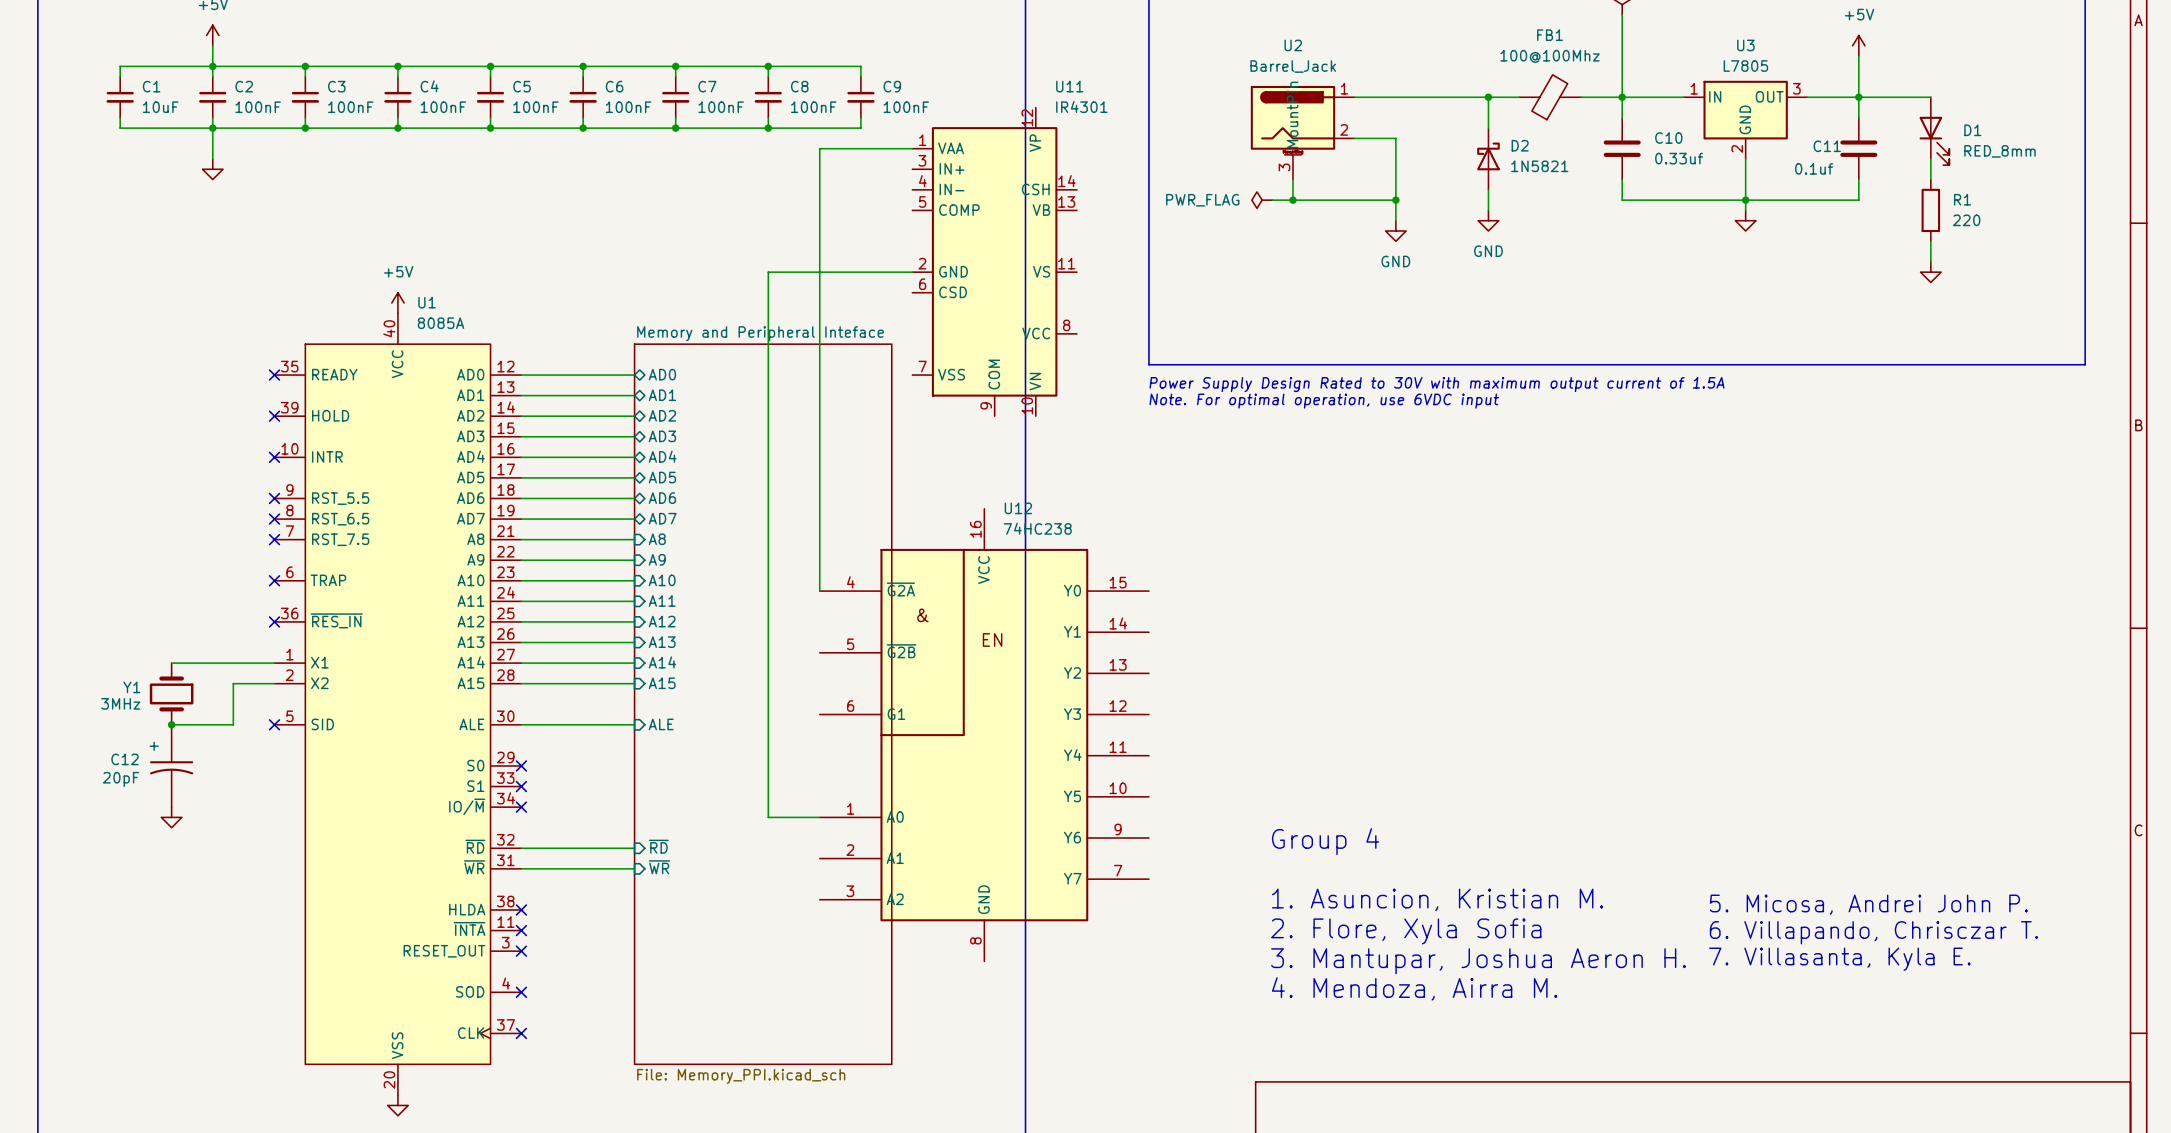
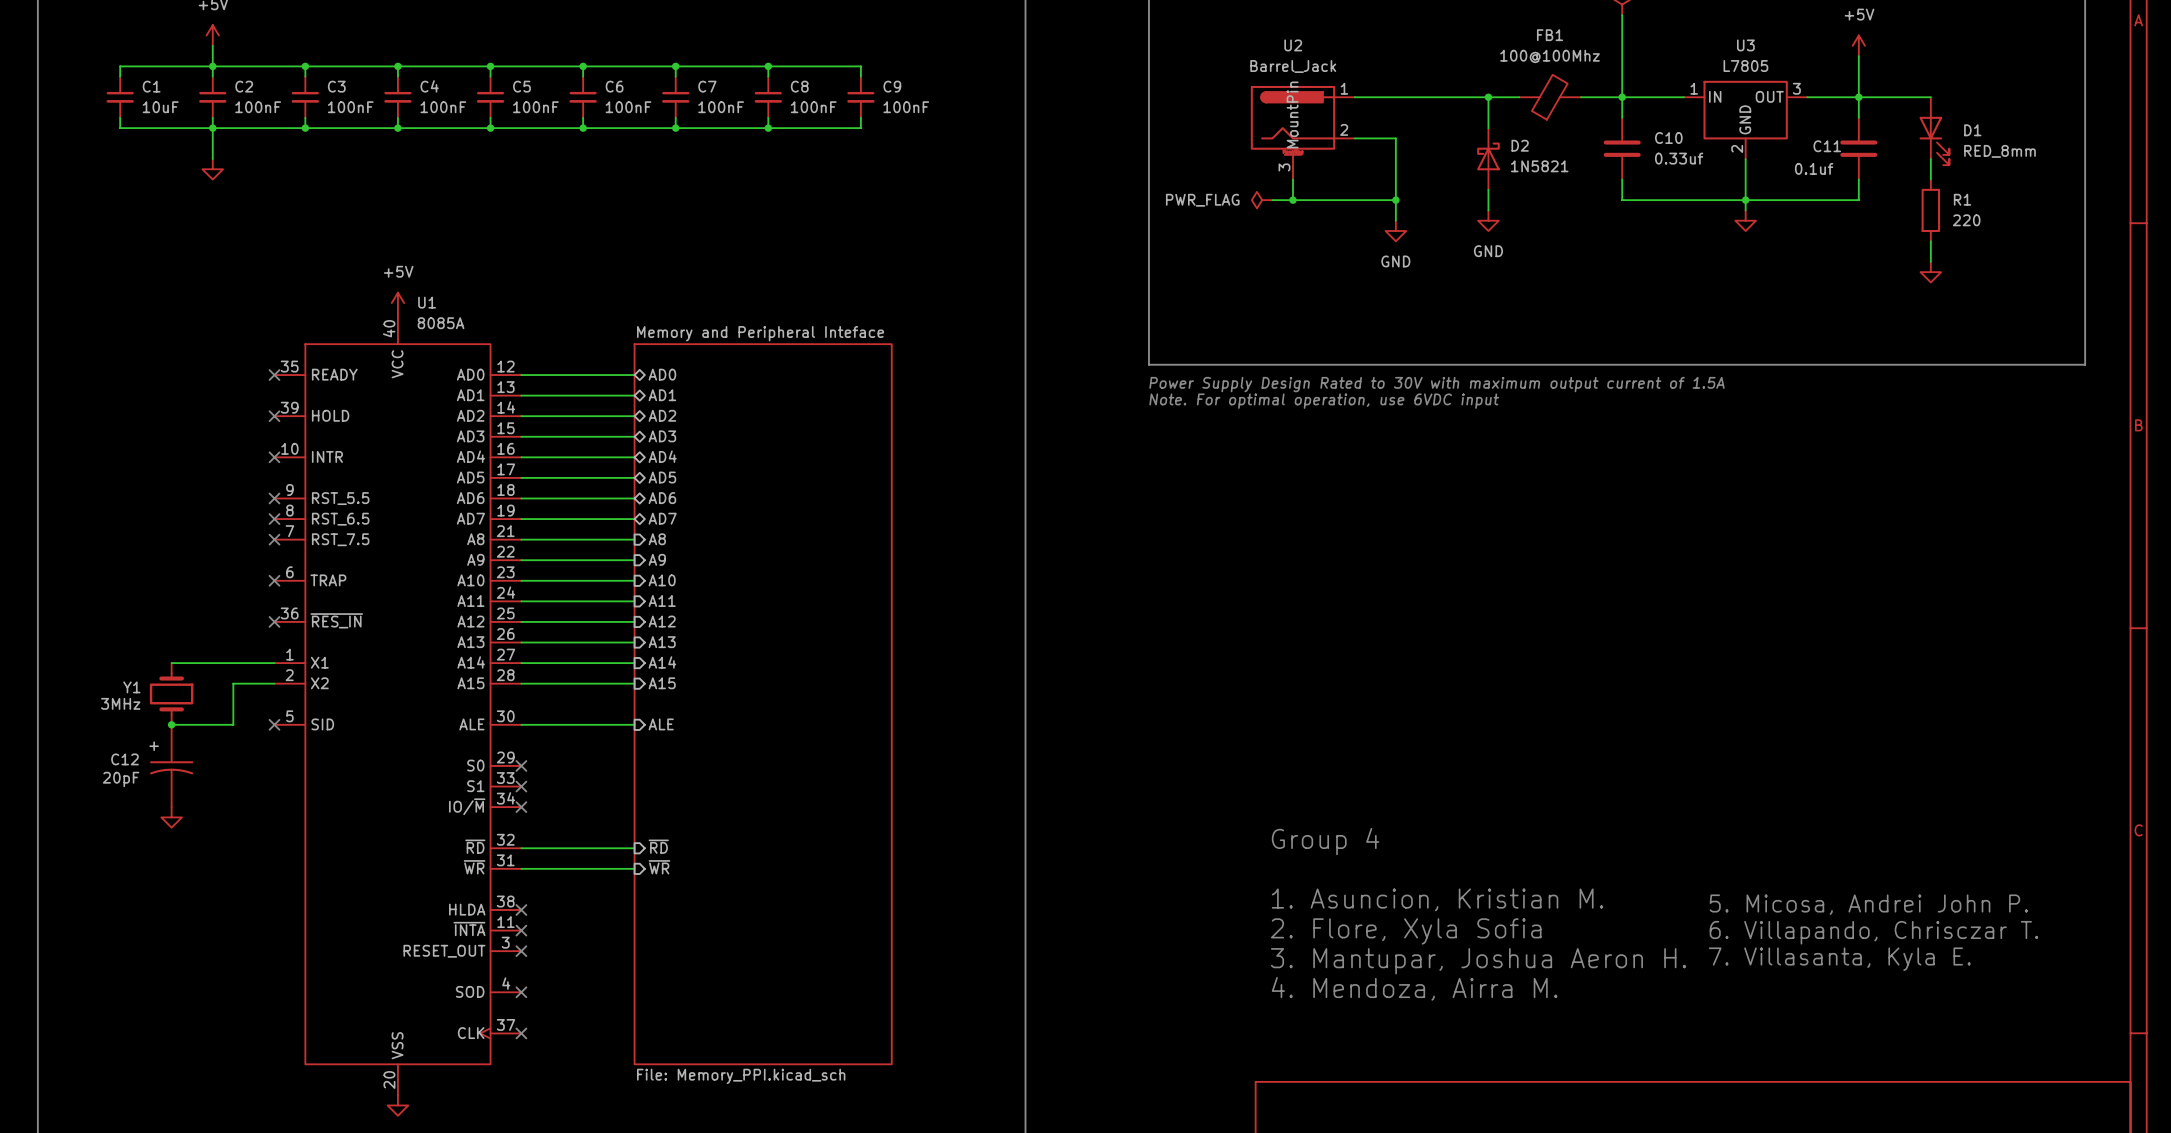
wire: (912, 148) (819, 148) (819, 591) -> none
U11: IR4301 (994, 261) -> none
wire: (912, 272) (768, 272) (768, 817) (819, 817) -> none
U12: 74HC238 (984, 735) -> none

